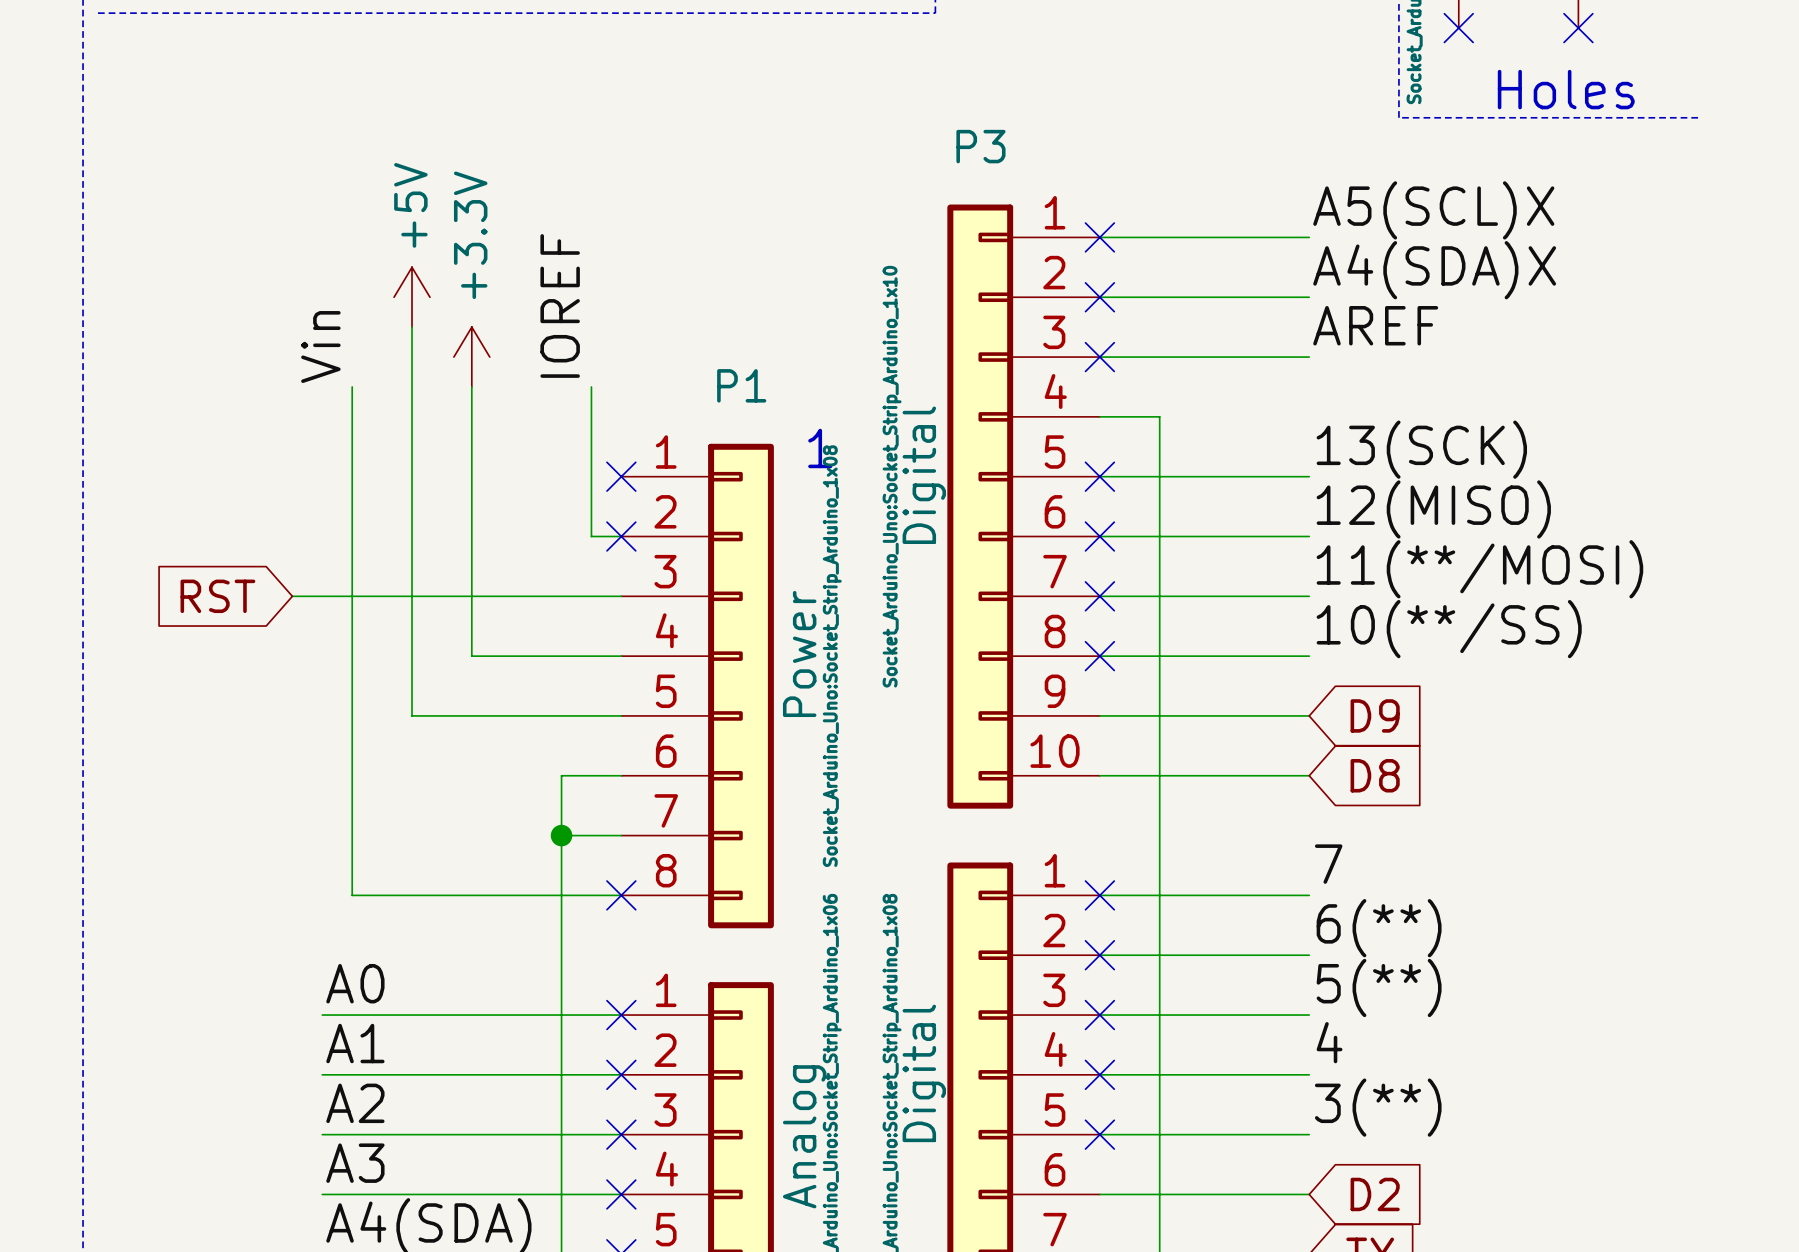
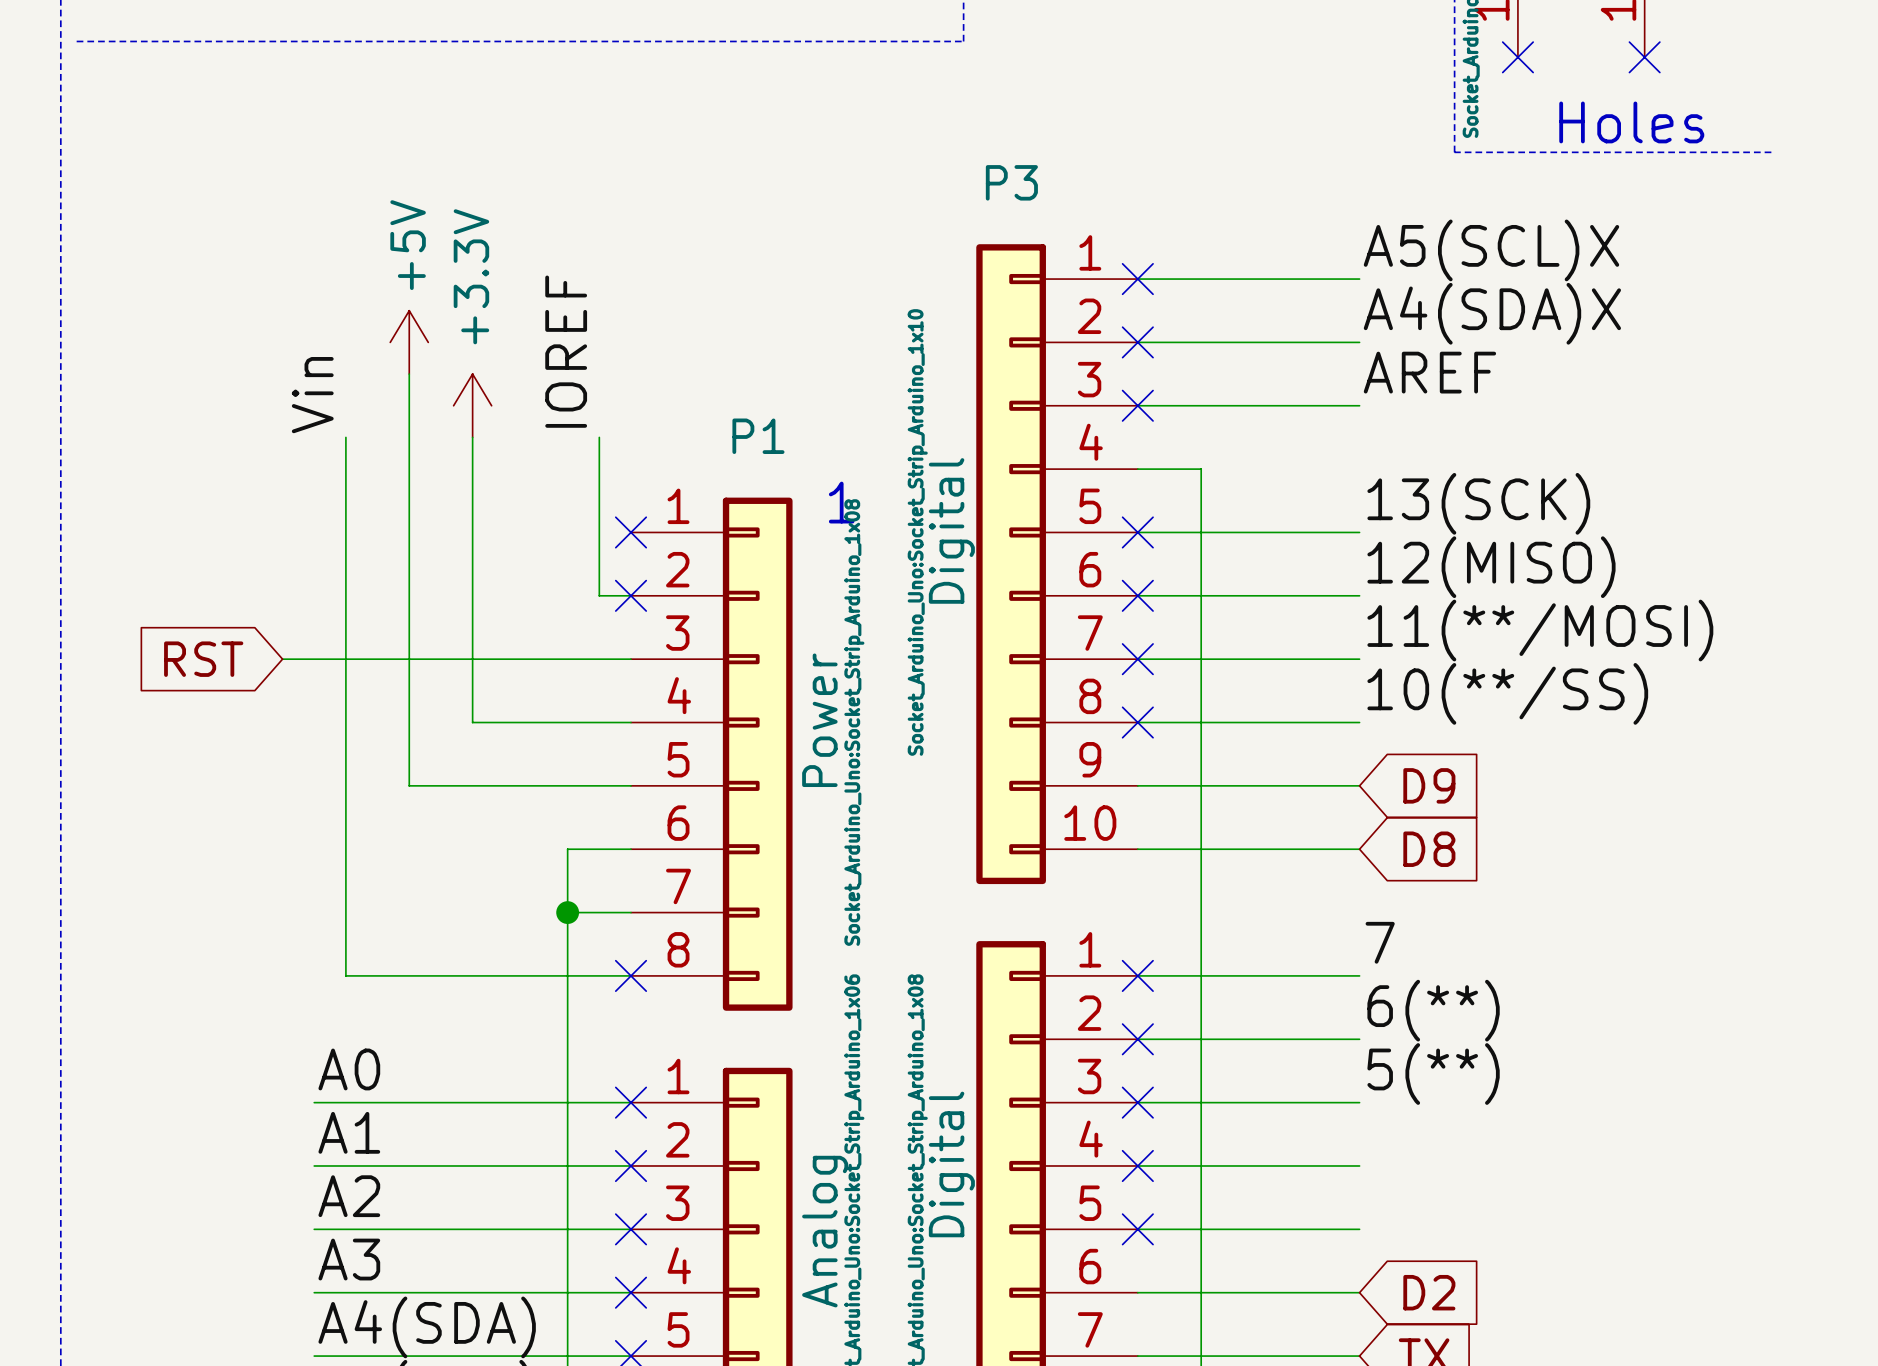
label: 4 (1329, 1042) -> none
label: 3(**) (1378, 1107) -> none

